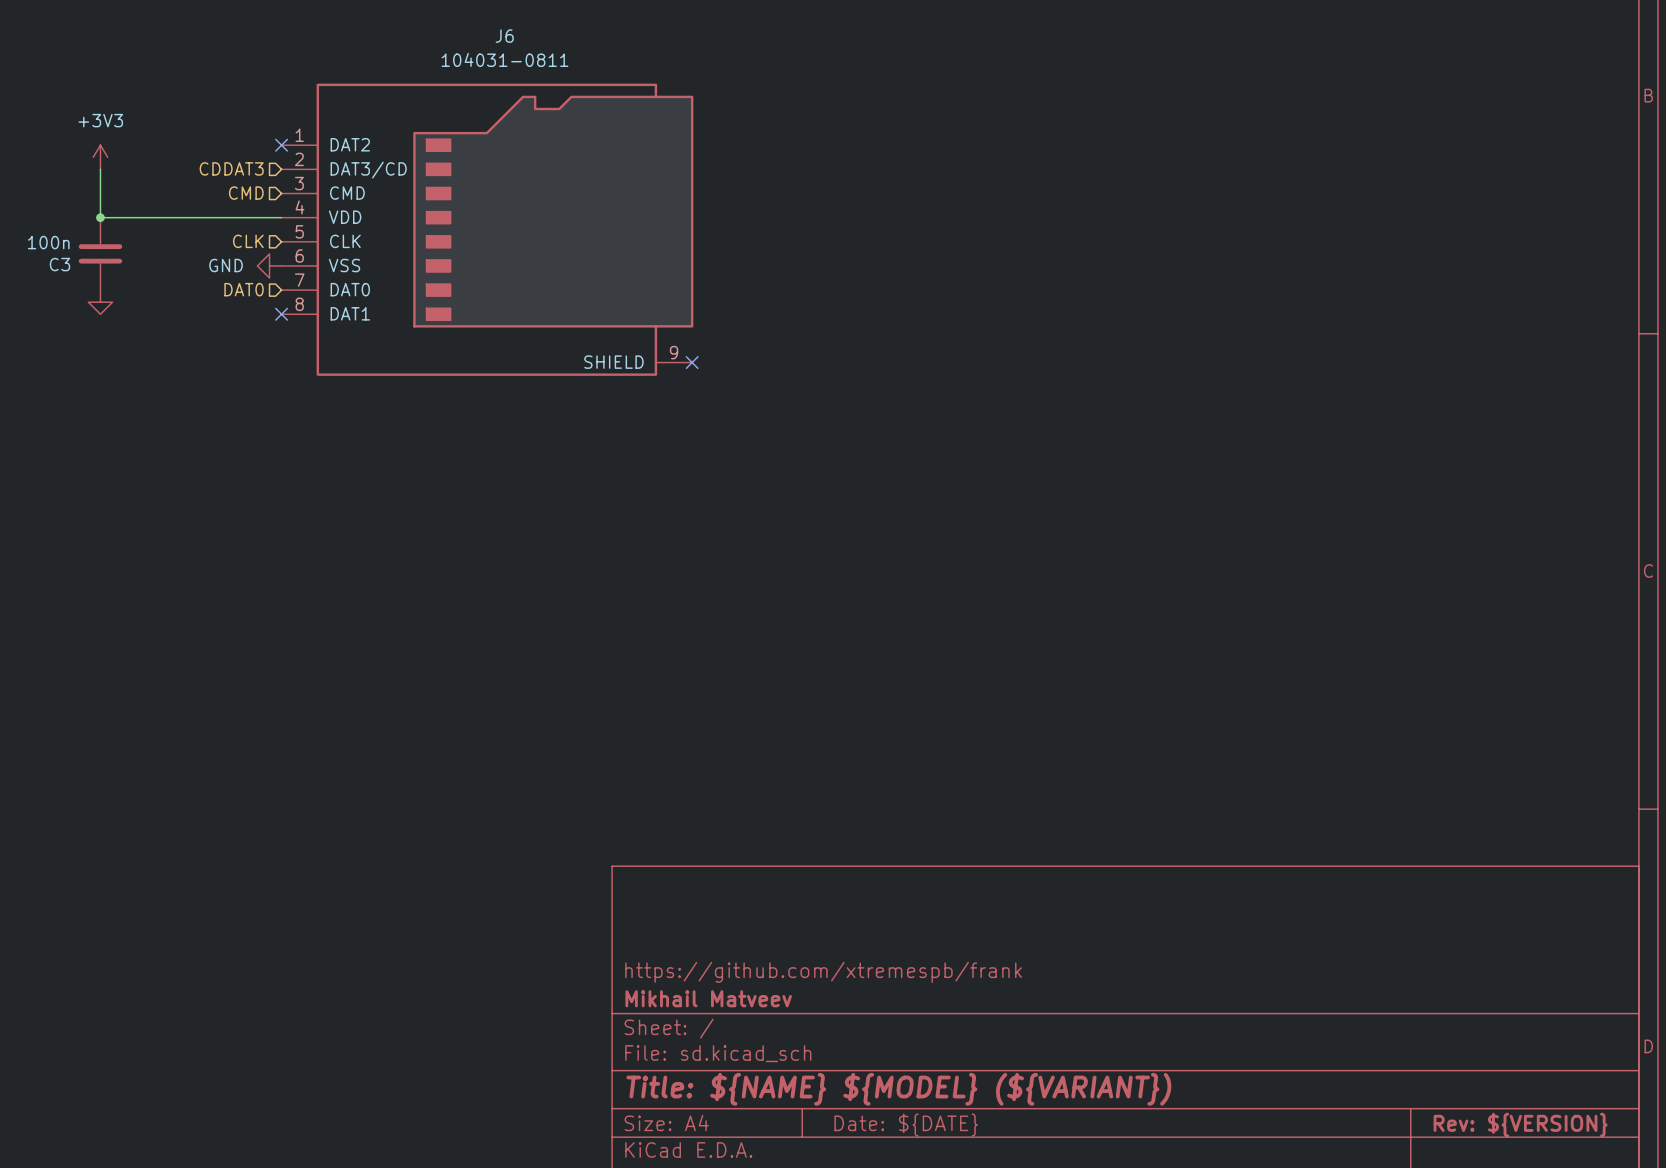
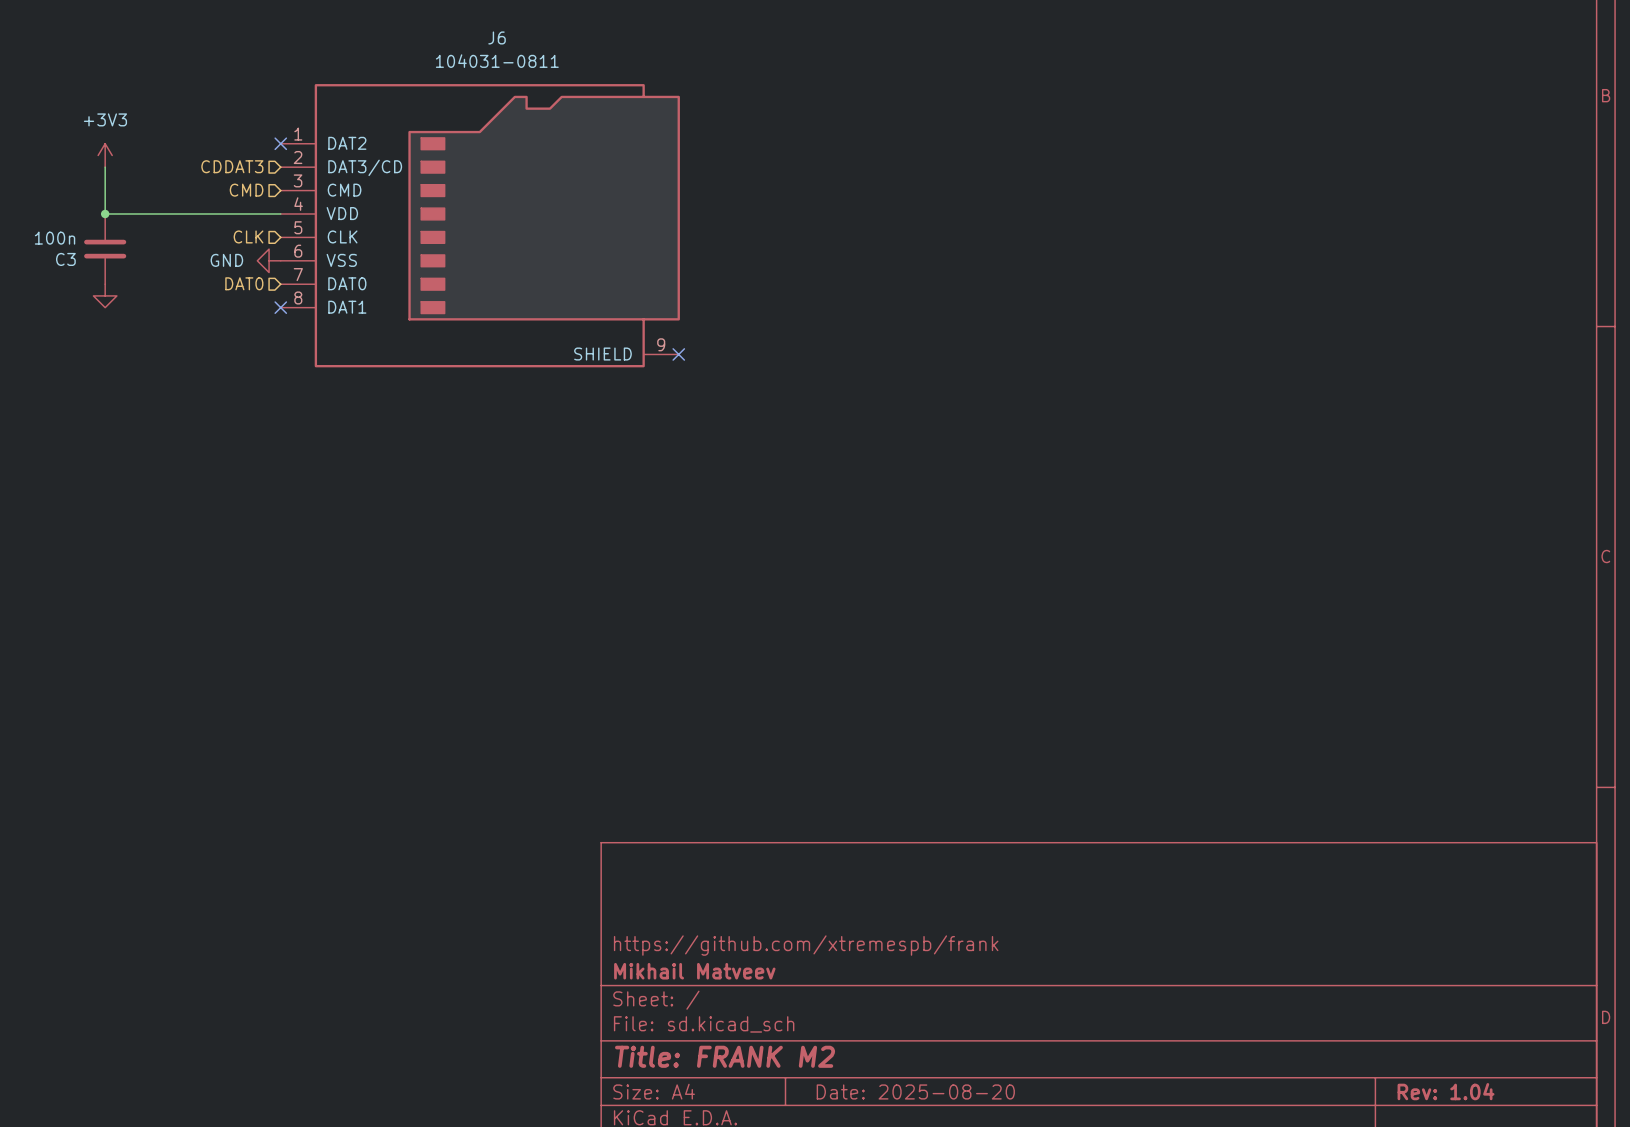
title block: Title: ${NAME} ${MODEL} (${VARIANT}) (898, 1089) -> Title: FRANK M2 (725, 1056)
title block: Date: ${DATE} (906, 1125) -> Date: 2025-08-20 (915, 1091)
title block: Rev: ${VERSION} (1520, 1125) -> Rev: 1.04 (1446, 1091)

